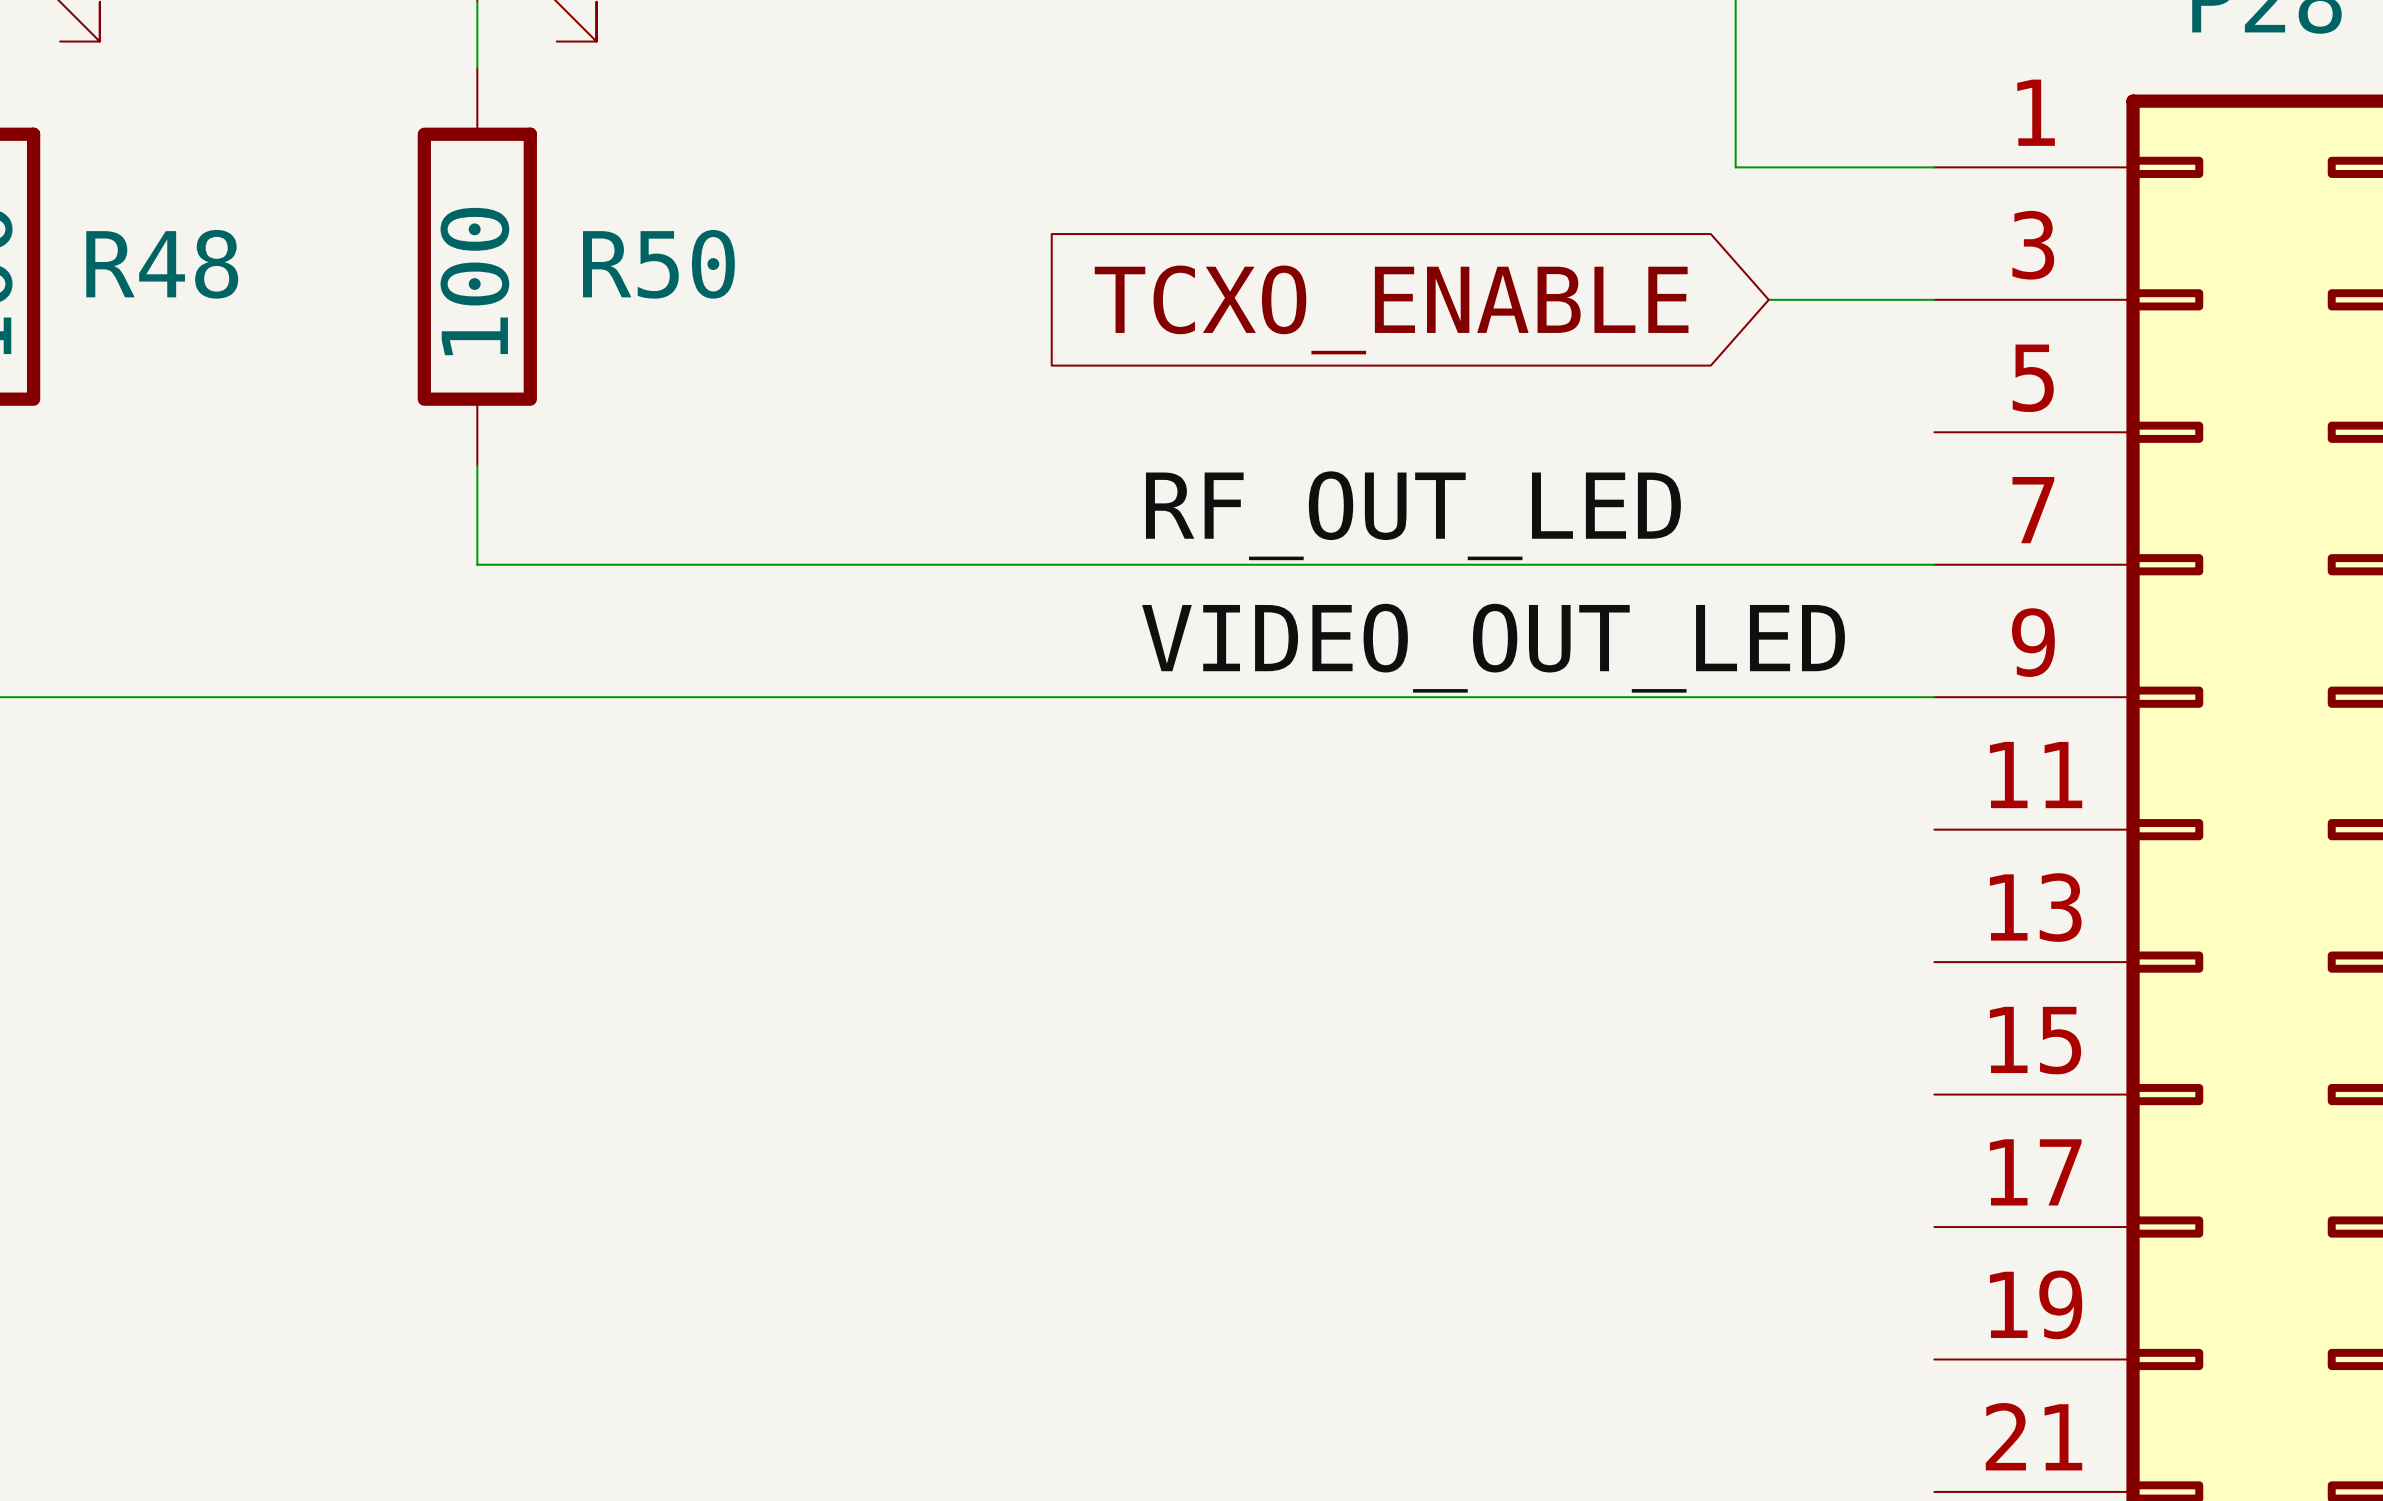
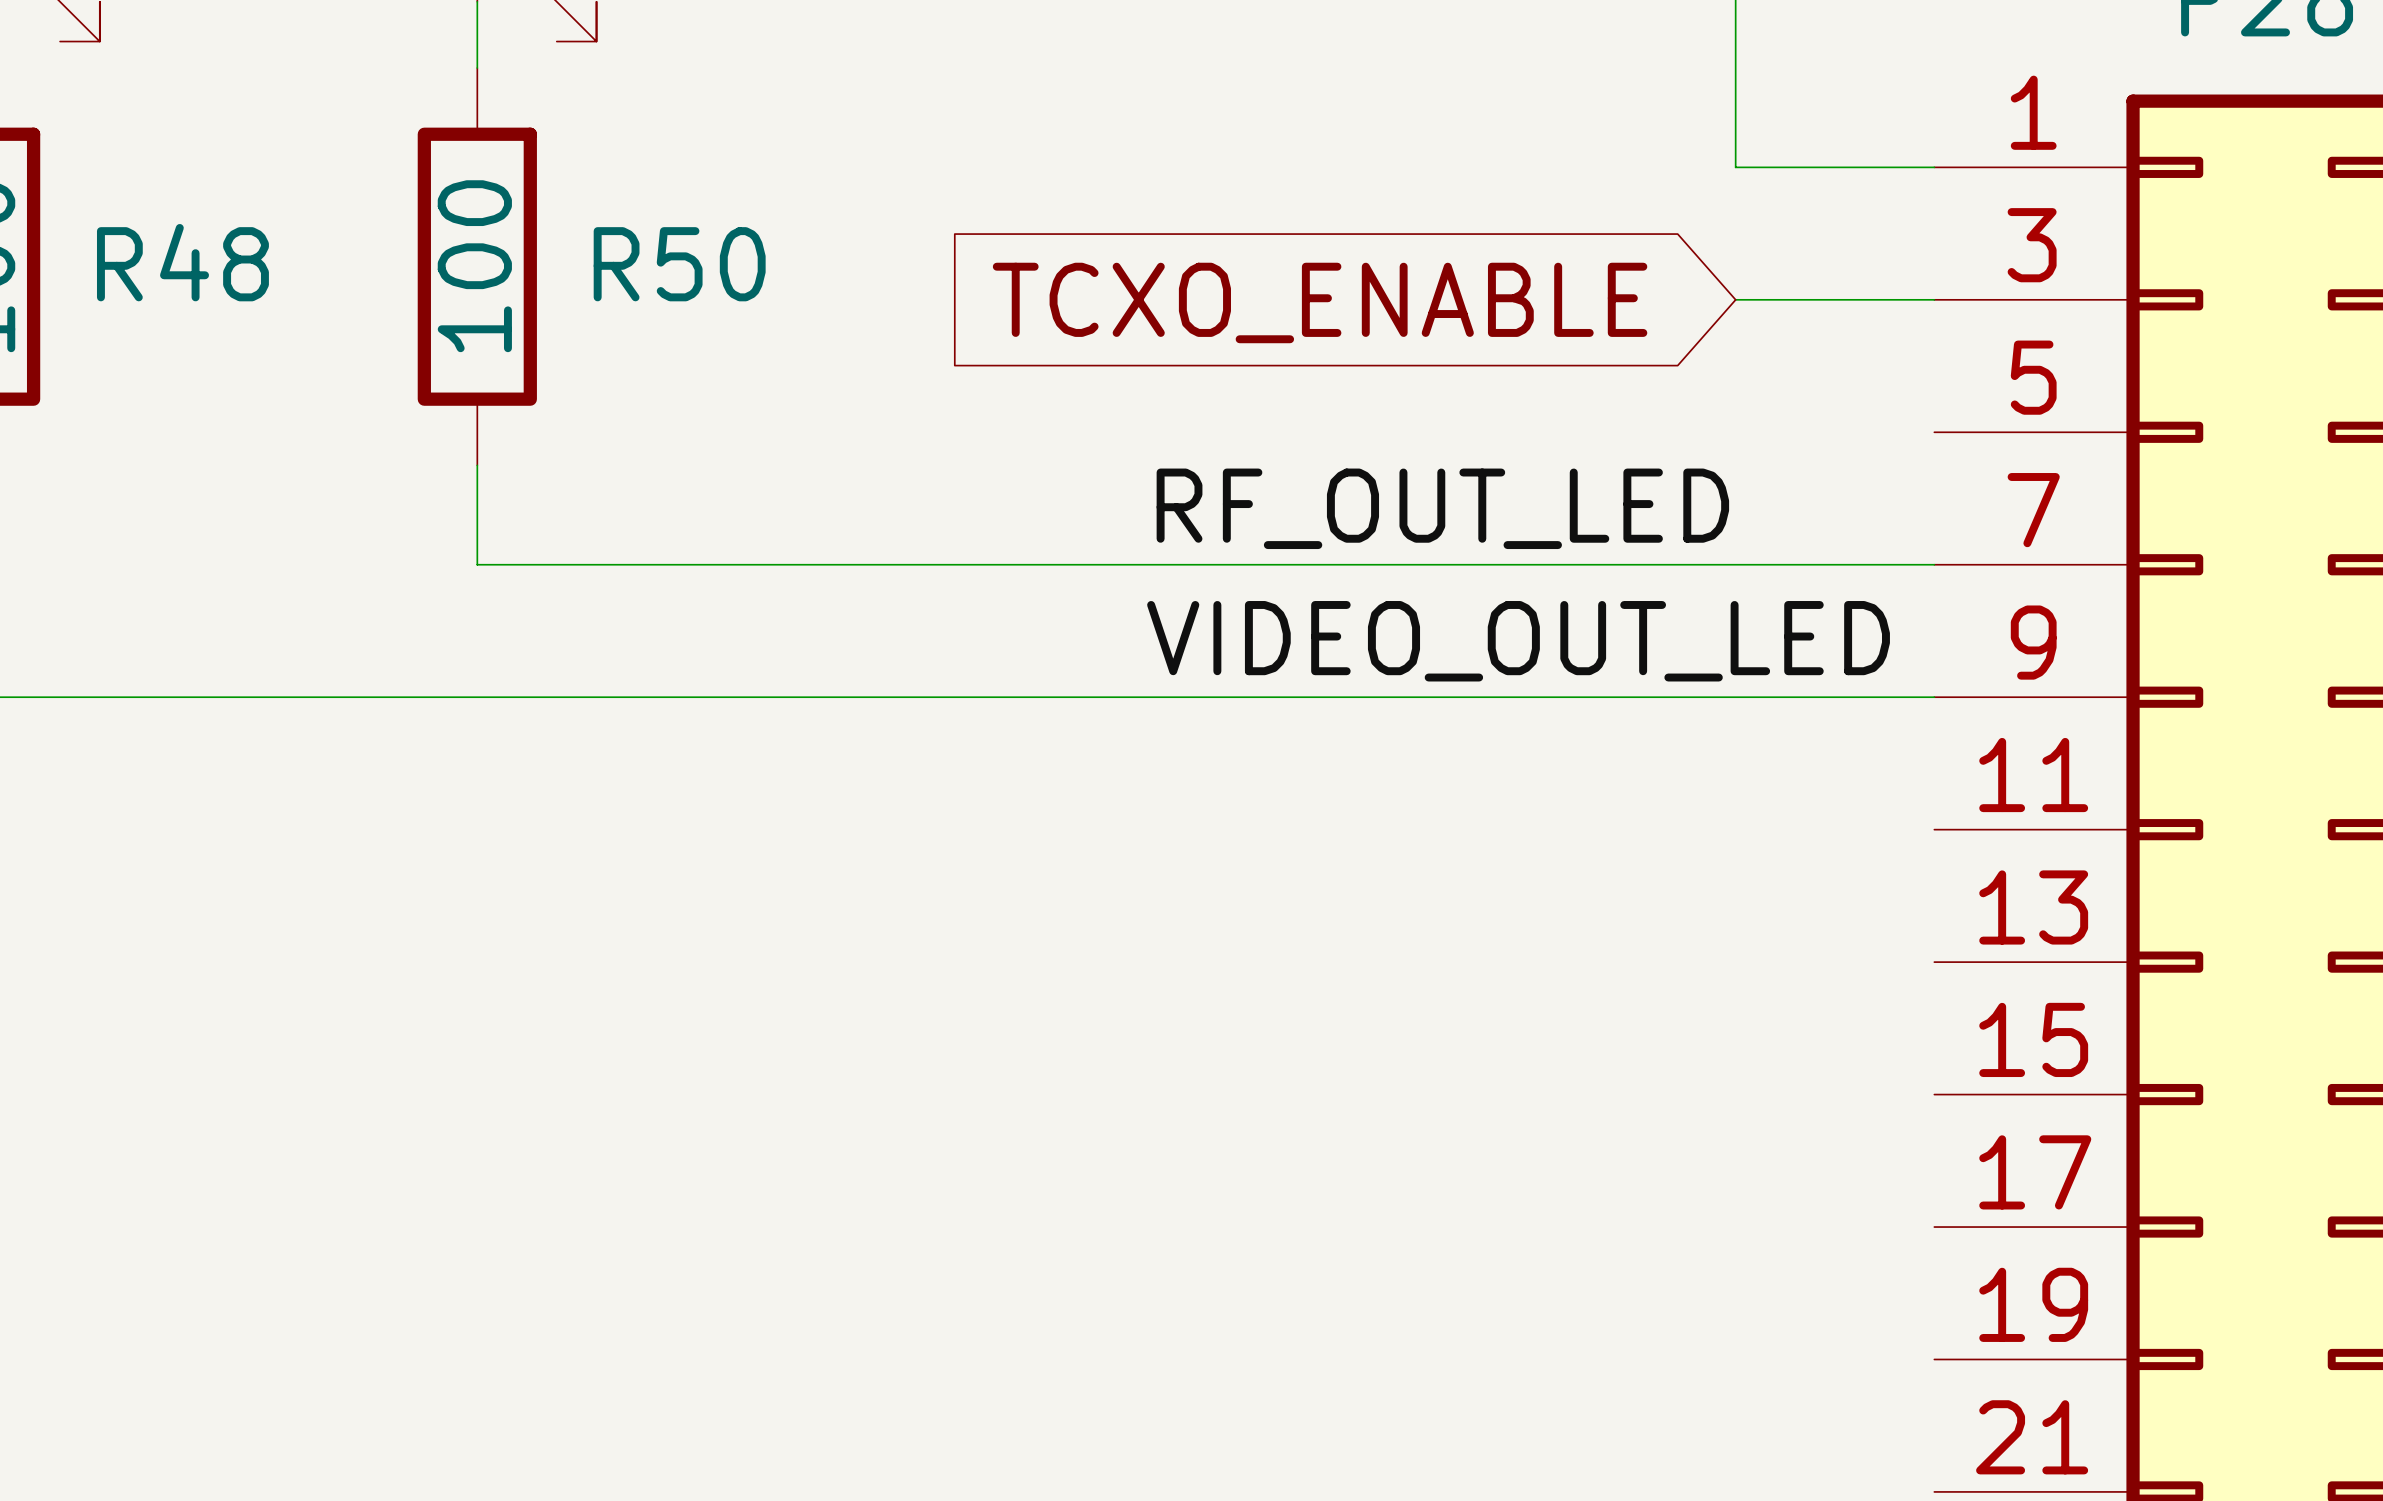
wire: none -> (1735, 299) (1768, 299)
global label position: TCXO_ENABLE (1391, 309) -> TCXO_ENABLE (1320, 302)

